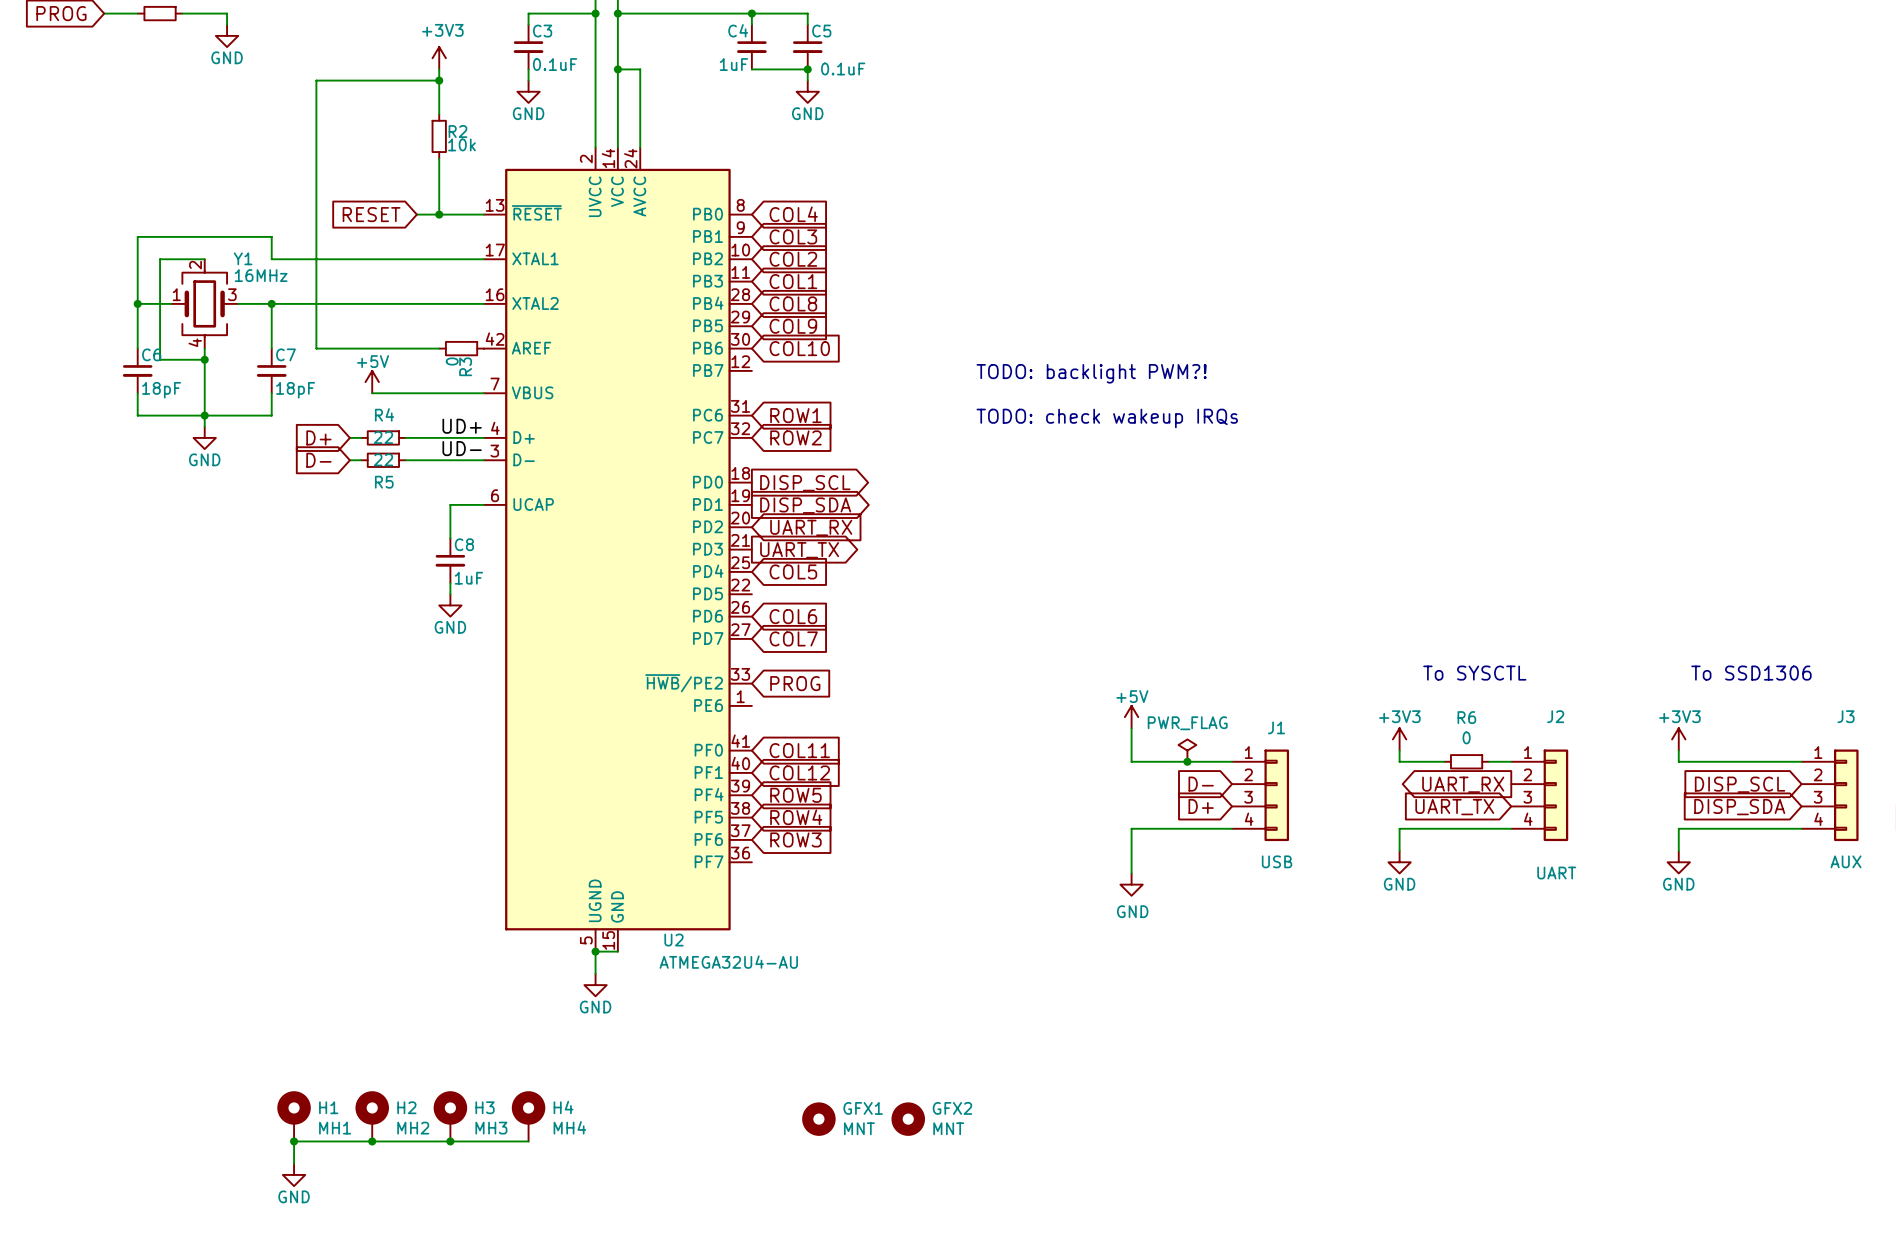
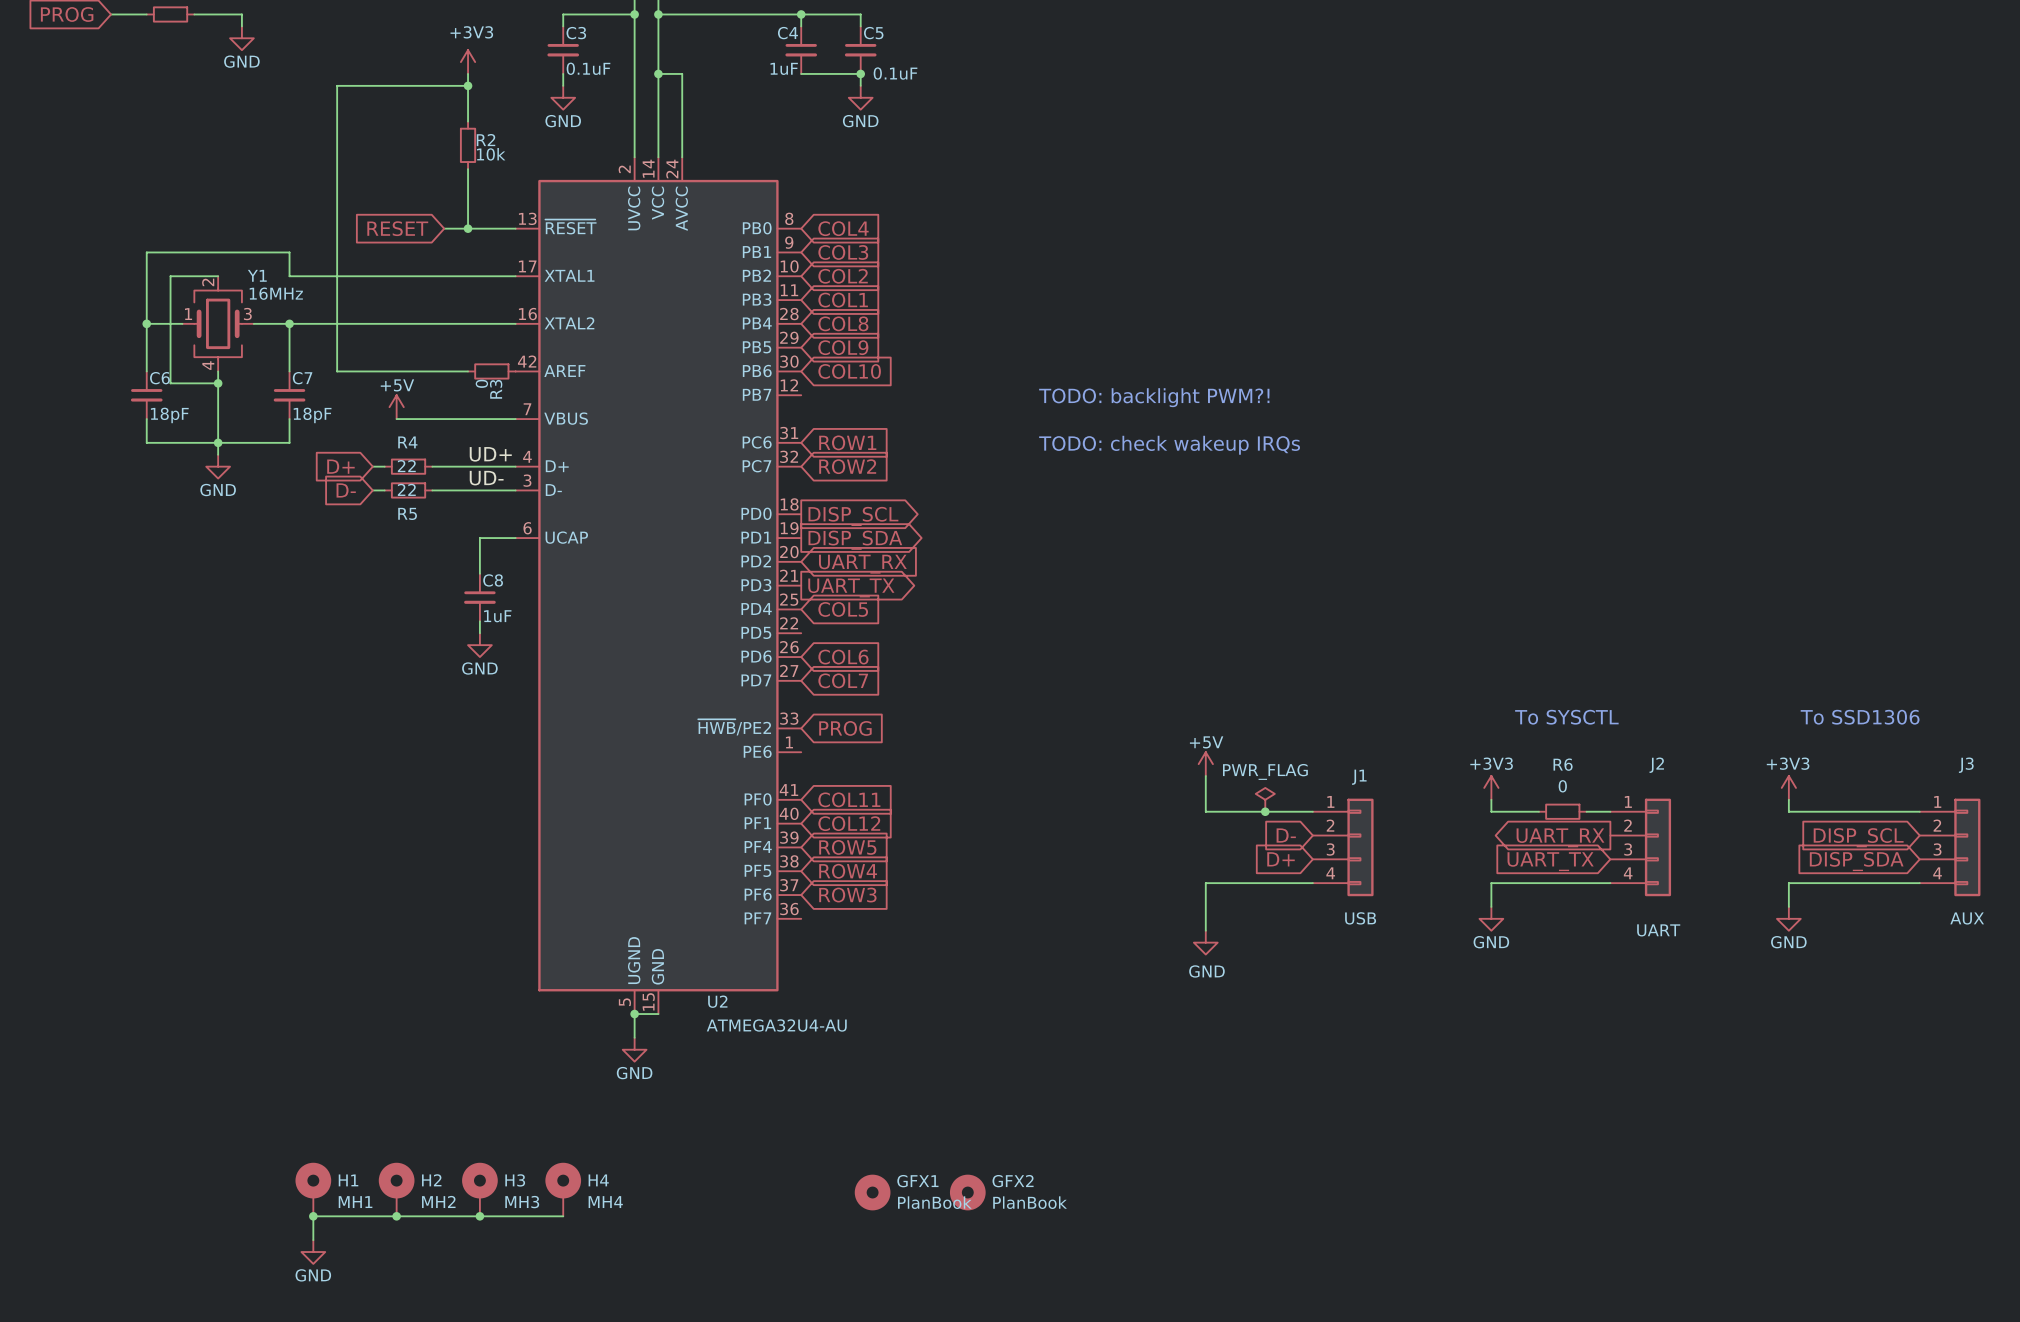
GFX1 value: MNT (859, 1128) -> PlanBook (934, 1202)
GFX2 value: MNT (948, 1128) -> PlanBook (1030, 1202)

